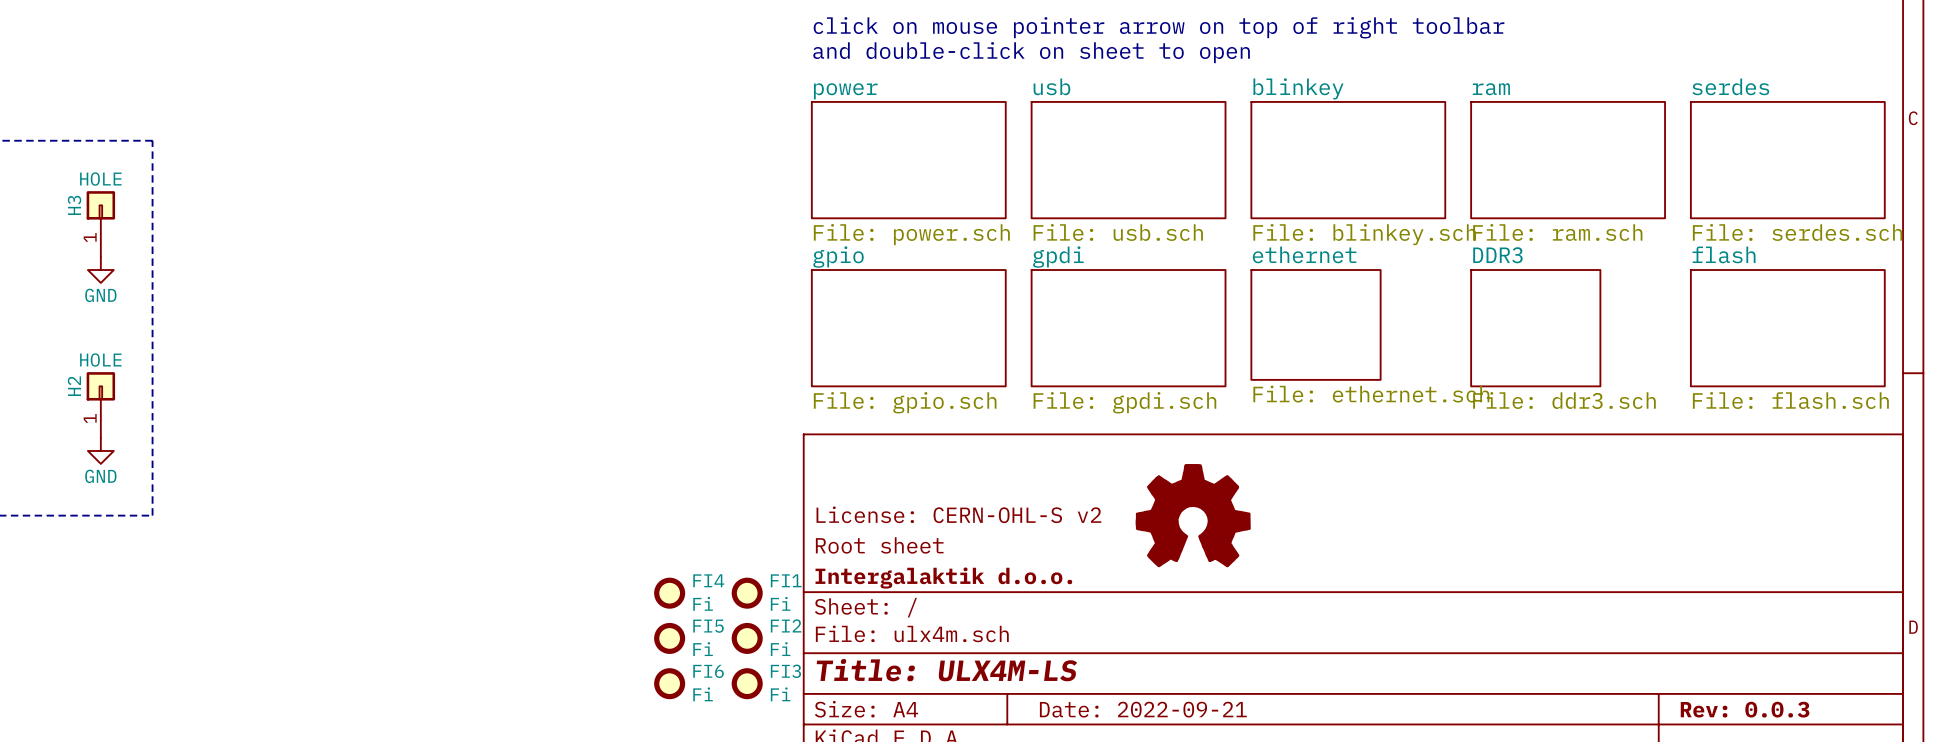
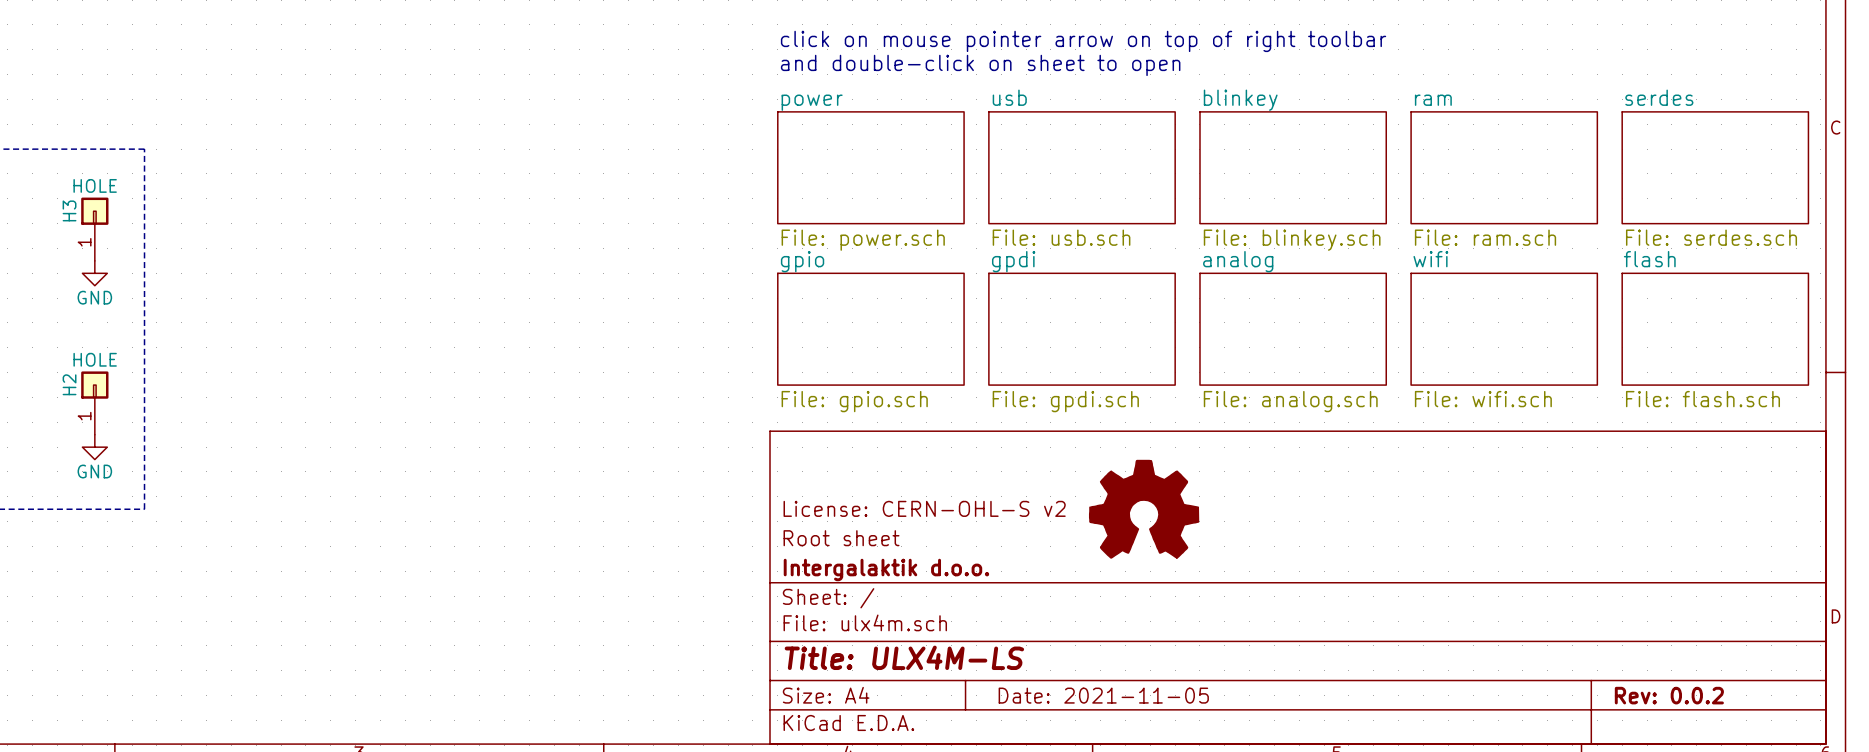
sheet ethernet: File: ethernet.sch (1315, 324) -> none
sheet analog: none -> File: analog.sch (1293, 329)
sheet DDR3: File: ddr3.sch (1535, 328) -> none
sheet wifi: none -> File: wifi.sch (1504, 329)
FI4: Fi (669, 593) -> none
FI1: Fi (747, 593) -> none
FI5: Fi (669, 638) -> none
FI2: Fi (747, 638) -> none
FI6: Fi (669, 683) -> none
FI3: Fi (747, 683) -> none
title block: Date: 2022-09-21 (1143, 709) -> Date: 2021-11-05 (1103, 695)
title block: Rev: 0.0.3 (1745, 709) -> Rev: 0.0.2 (1669, 695)

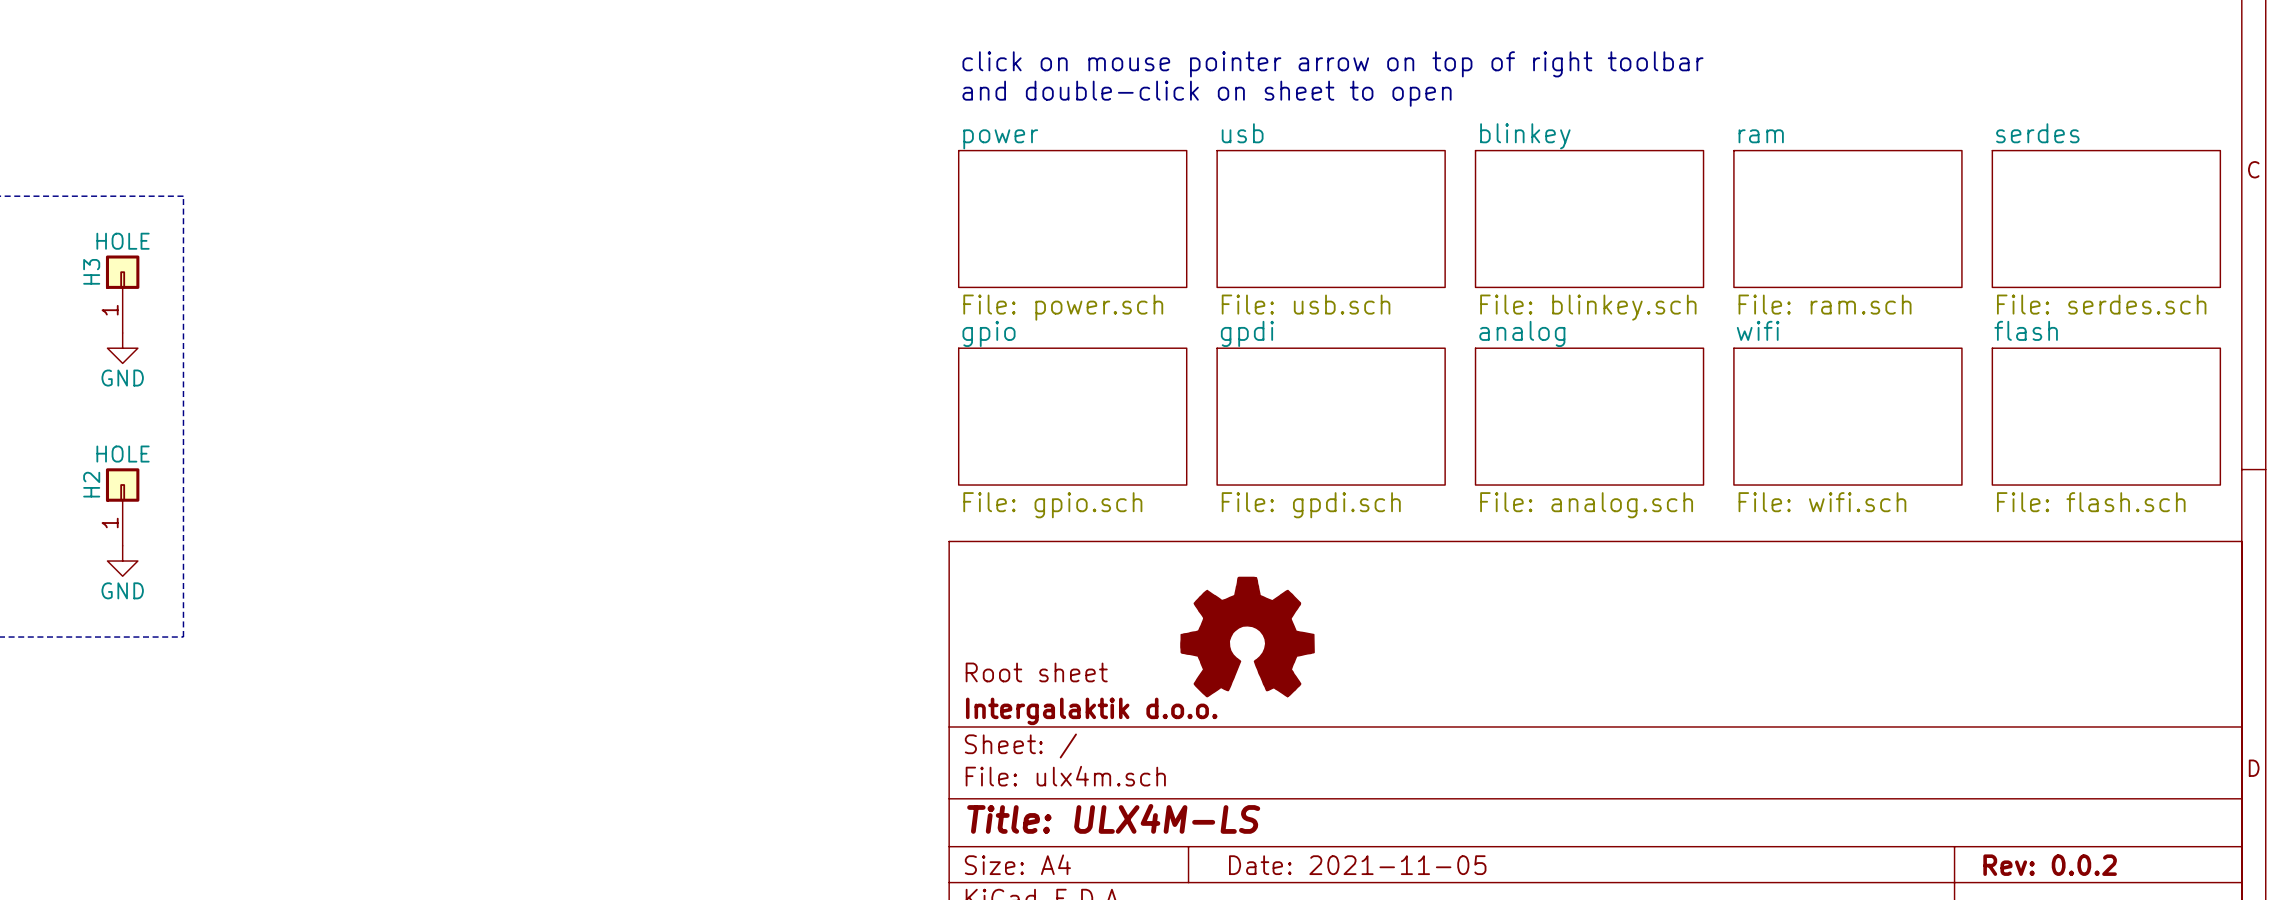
title block: License: CERN-OHL-S v2 (924, 508) -> none
power symbol position: (1144, 509) -> (1247, 637)

